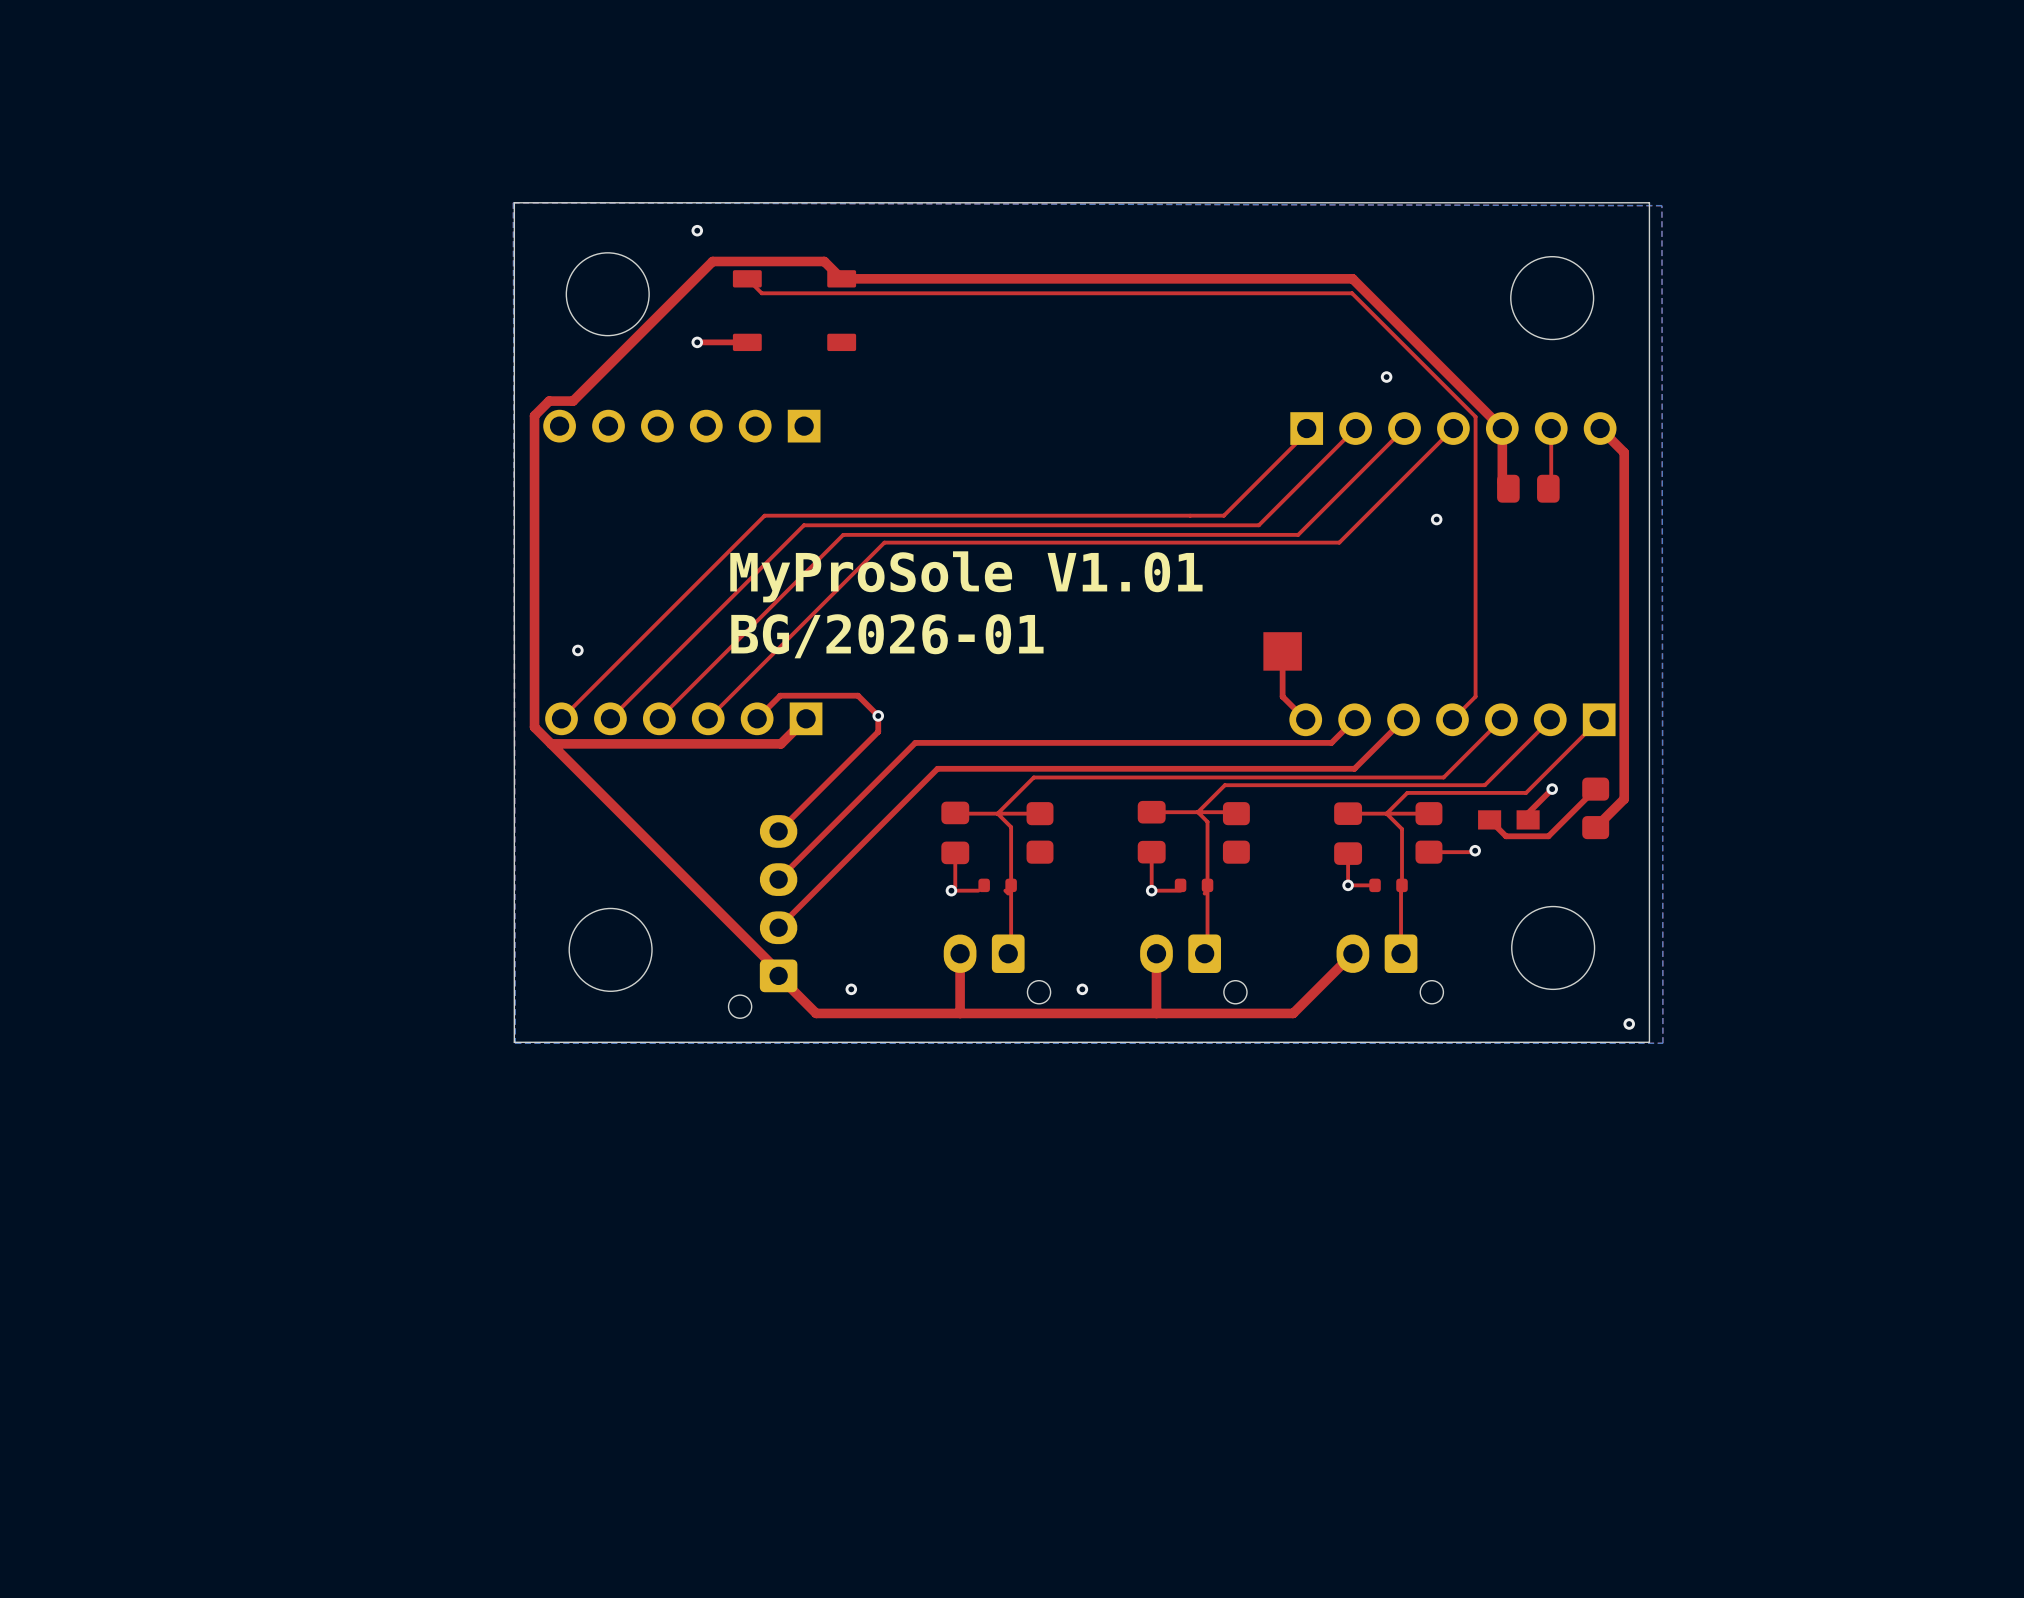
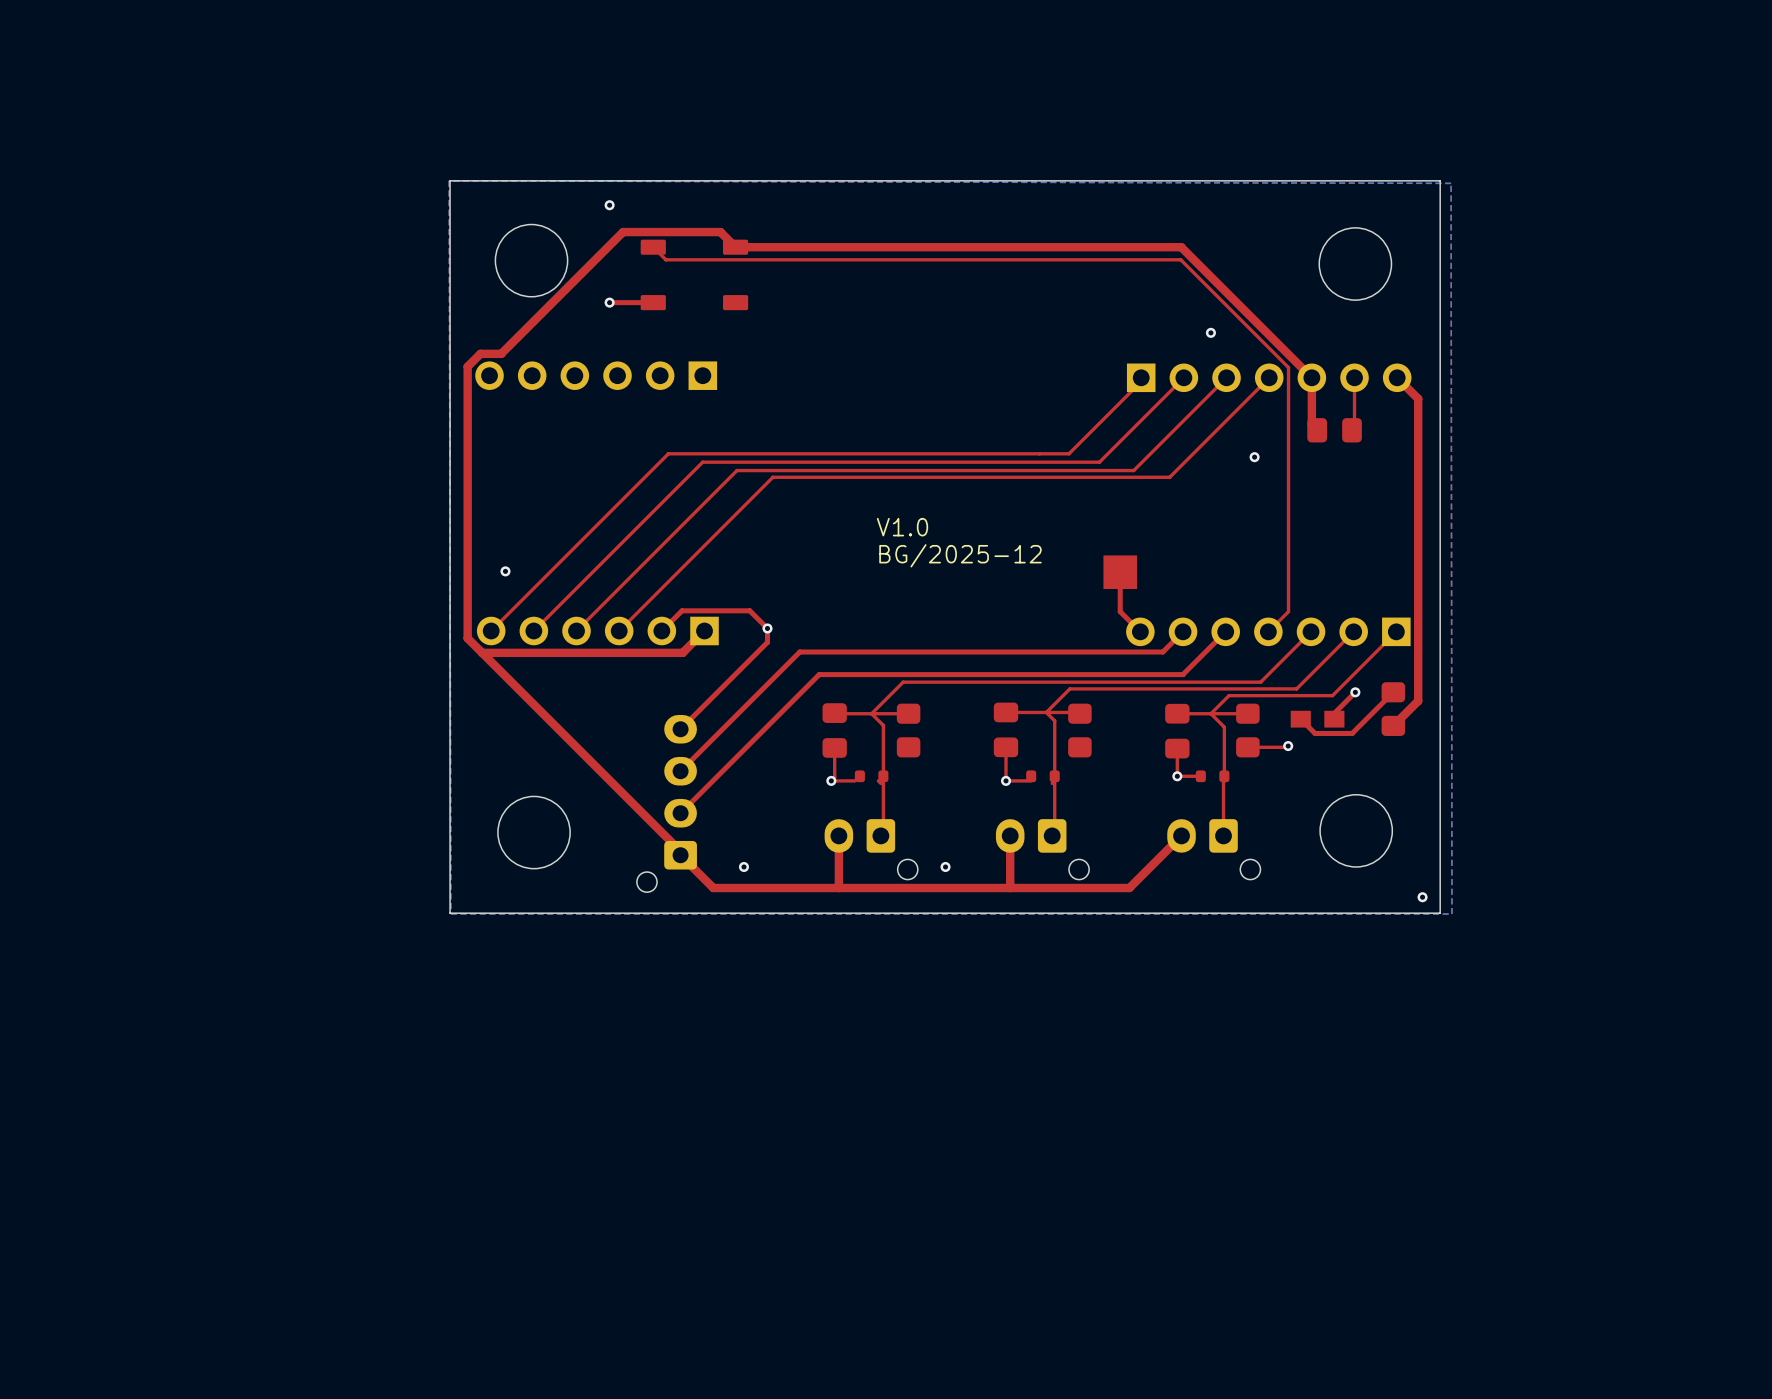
text: MyProSole V1.01 (966, 576) -> none
text: none -> V1.0 (902, 527)
text: BG/2026-01 (887, 636) -> BG/2025-12 (960, 555)

